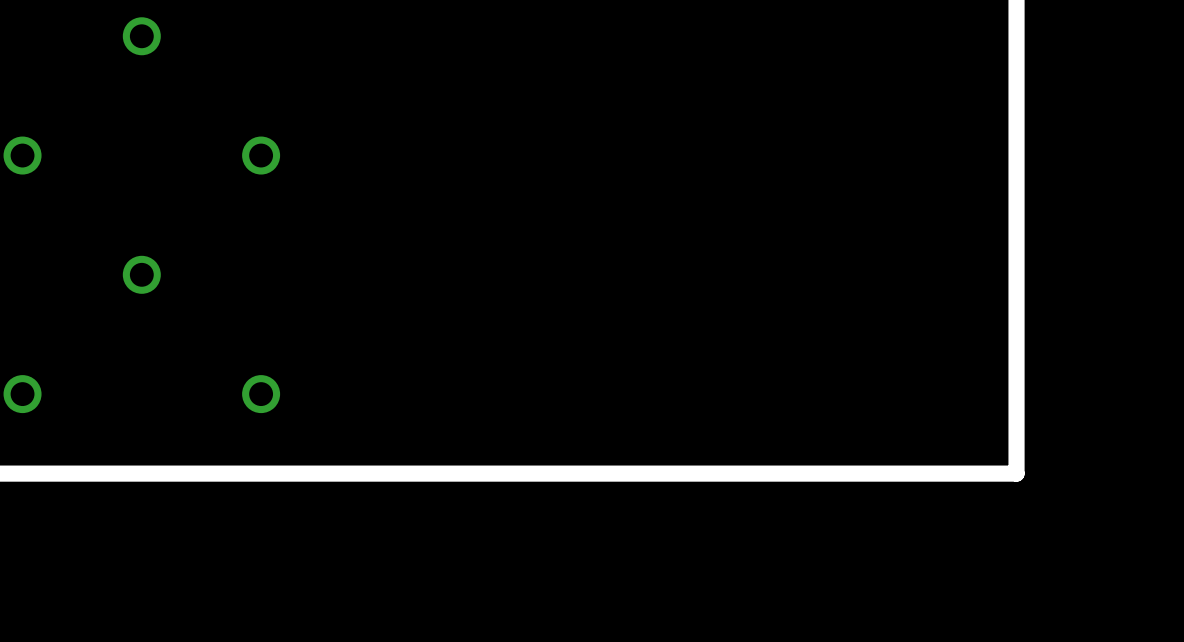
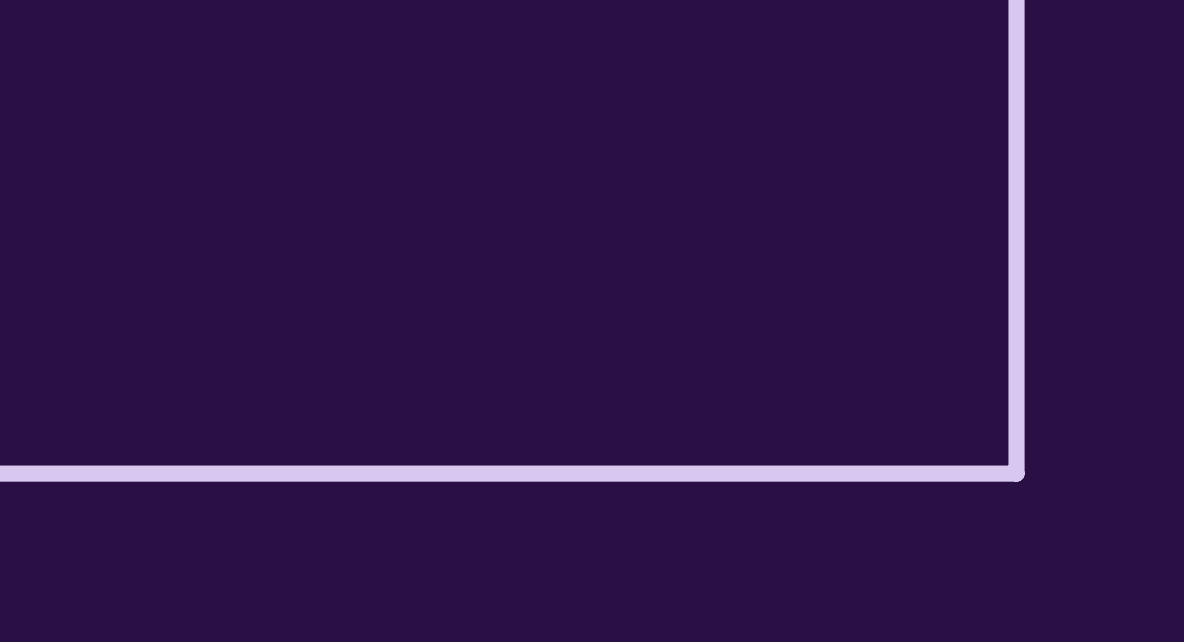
via: (141, 36) -> none
via: (22, 155) -> none
via: (261, 155) -> none
via: (141, 274) -> none
via: (22, 394) -> none
via: (261, 394) -> none

